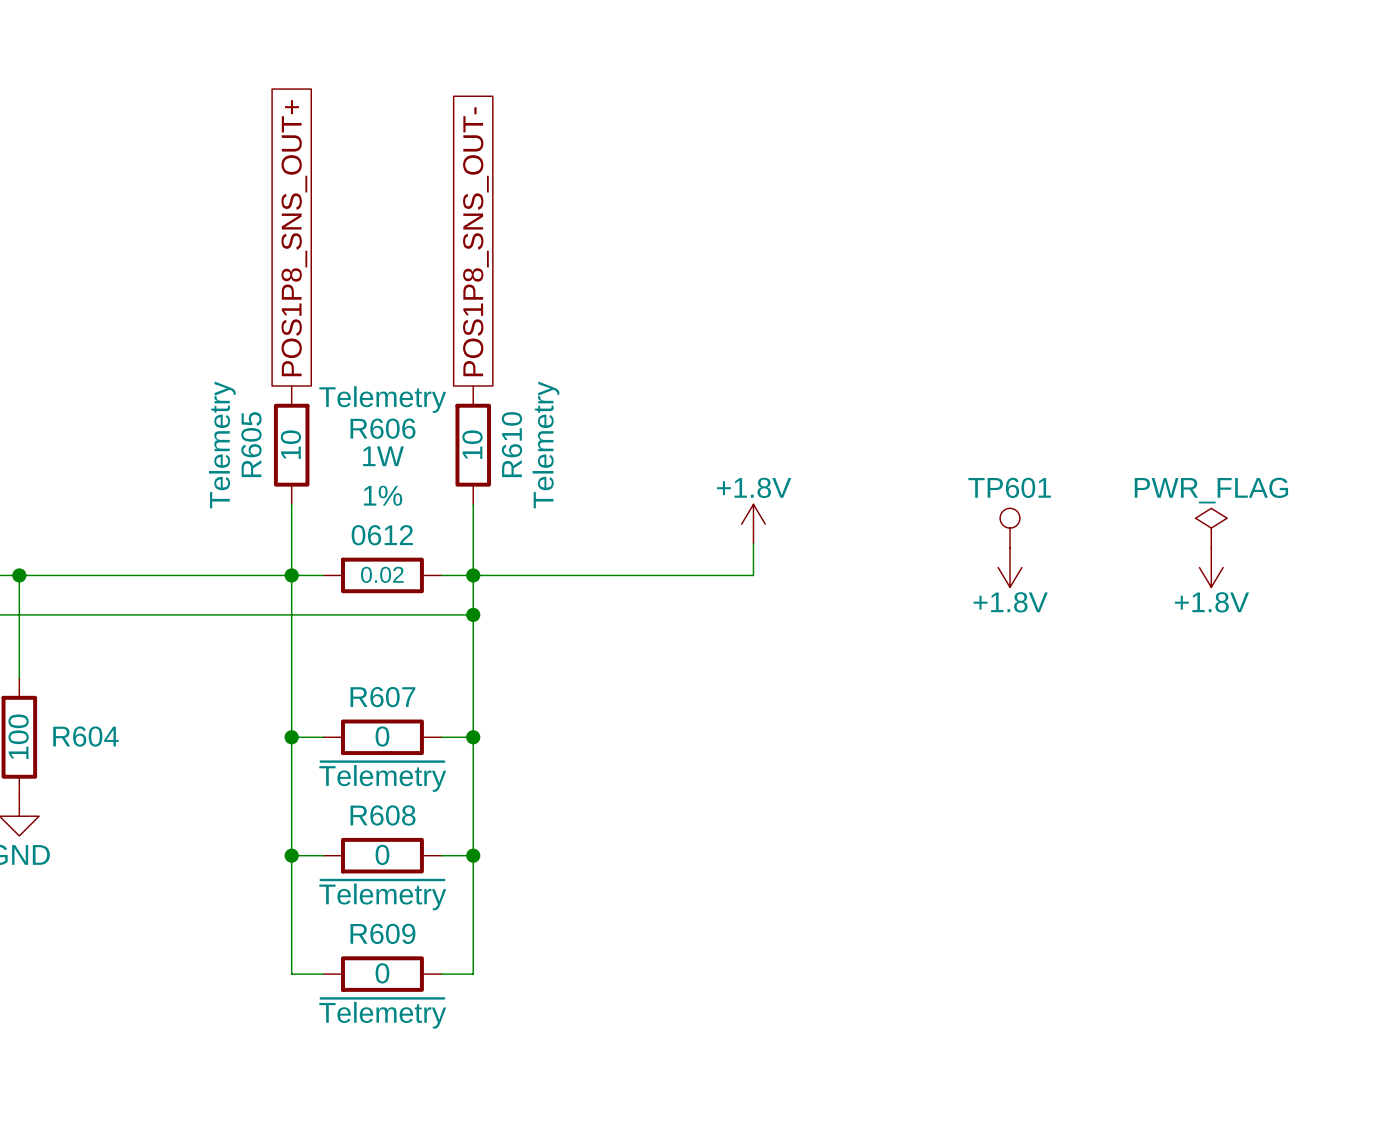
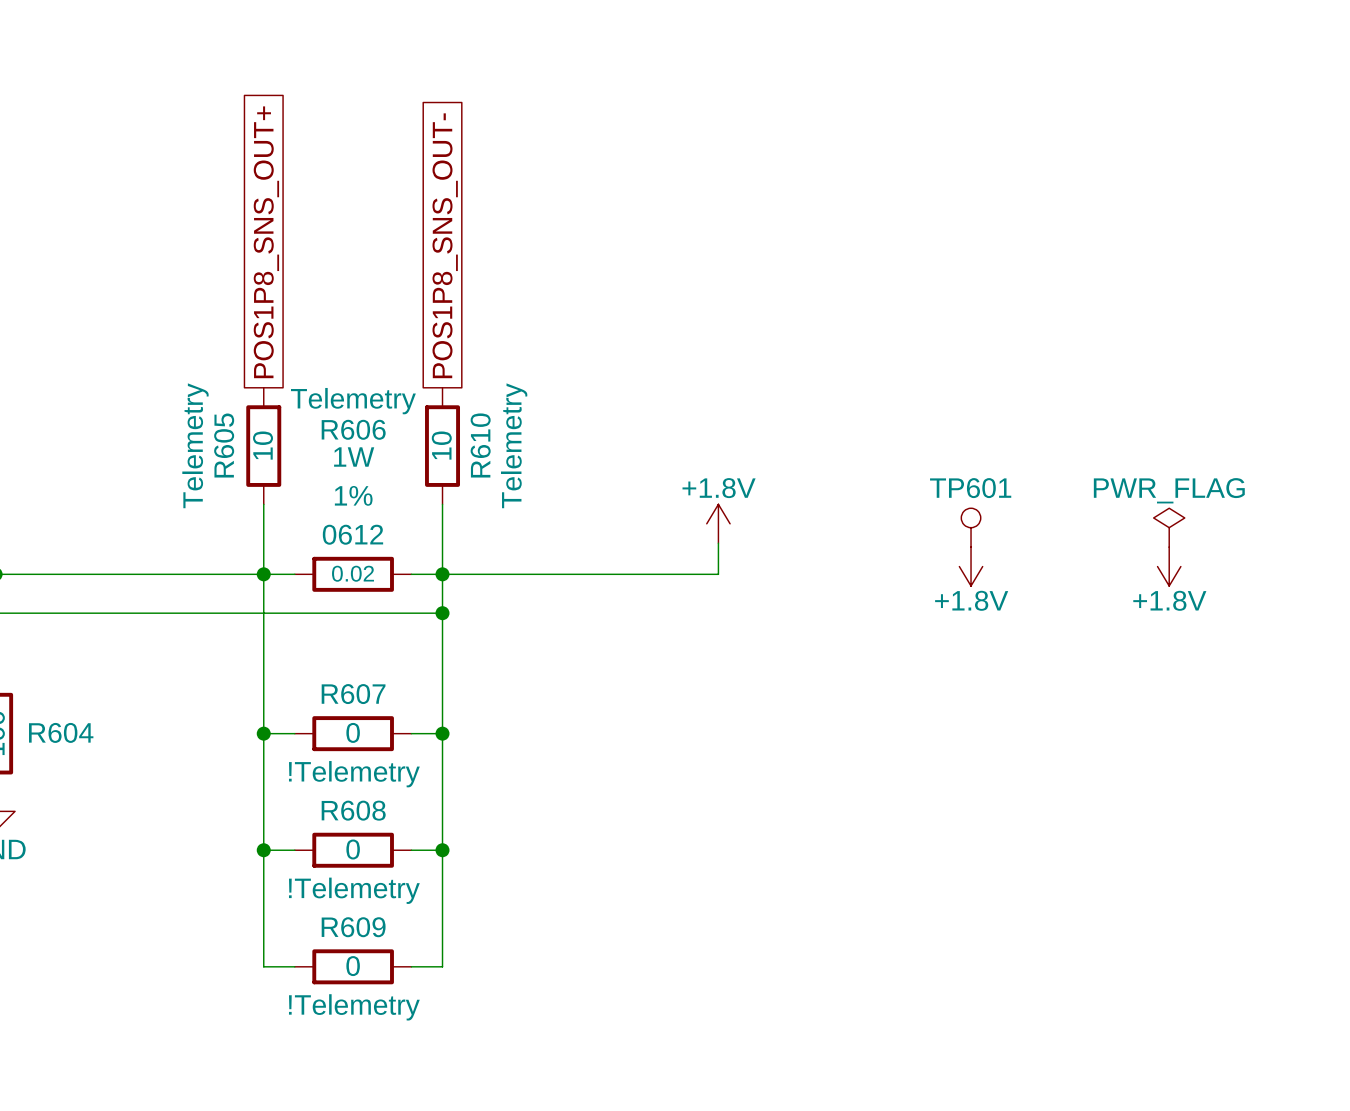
R607 text: ~{Telemetry} (382, 776) -> !Telemetry (354, 774)
R608 text: ~{Telemetry} (382, 895) -> !Telemetry (354, 890)
R609 text: ~{Telemetry} (382, 1013) -> !Telemetry (354, 1007)

